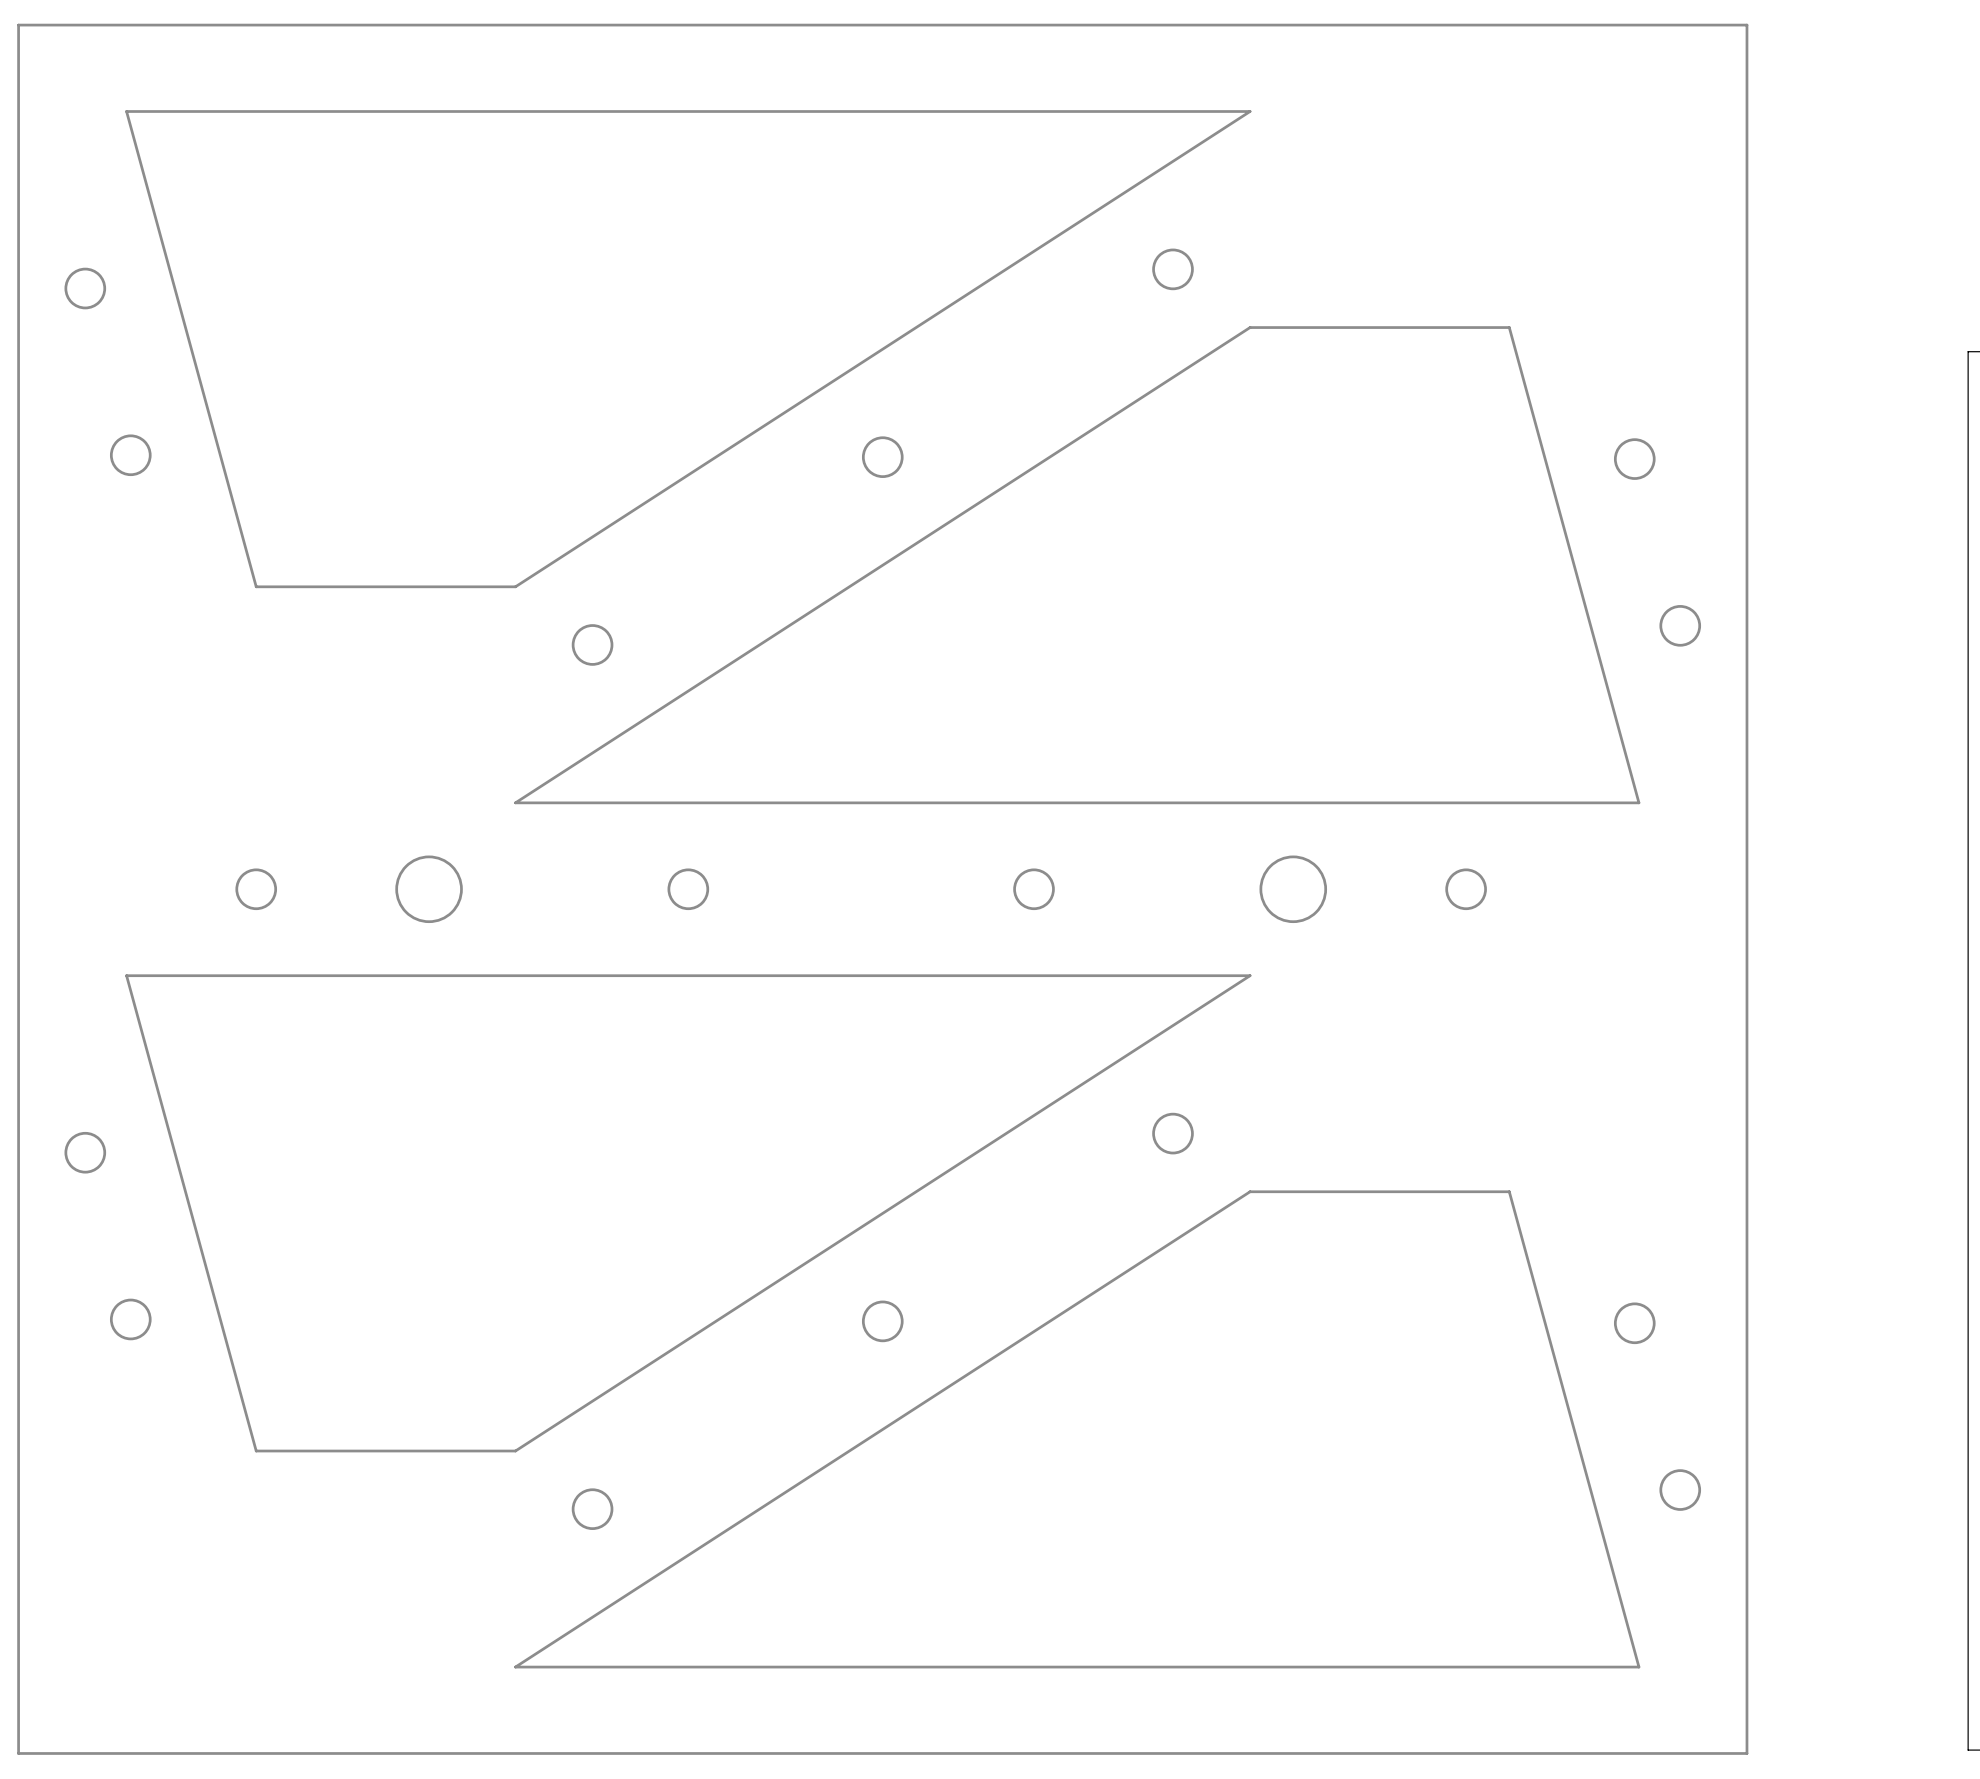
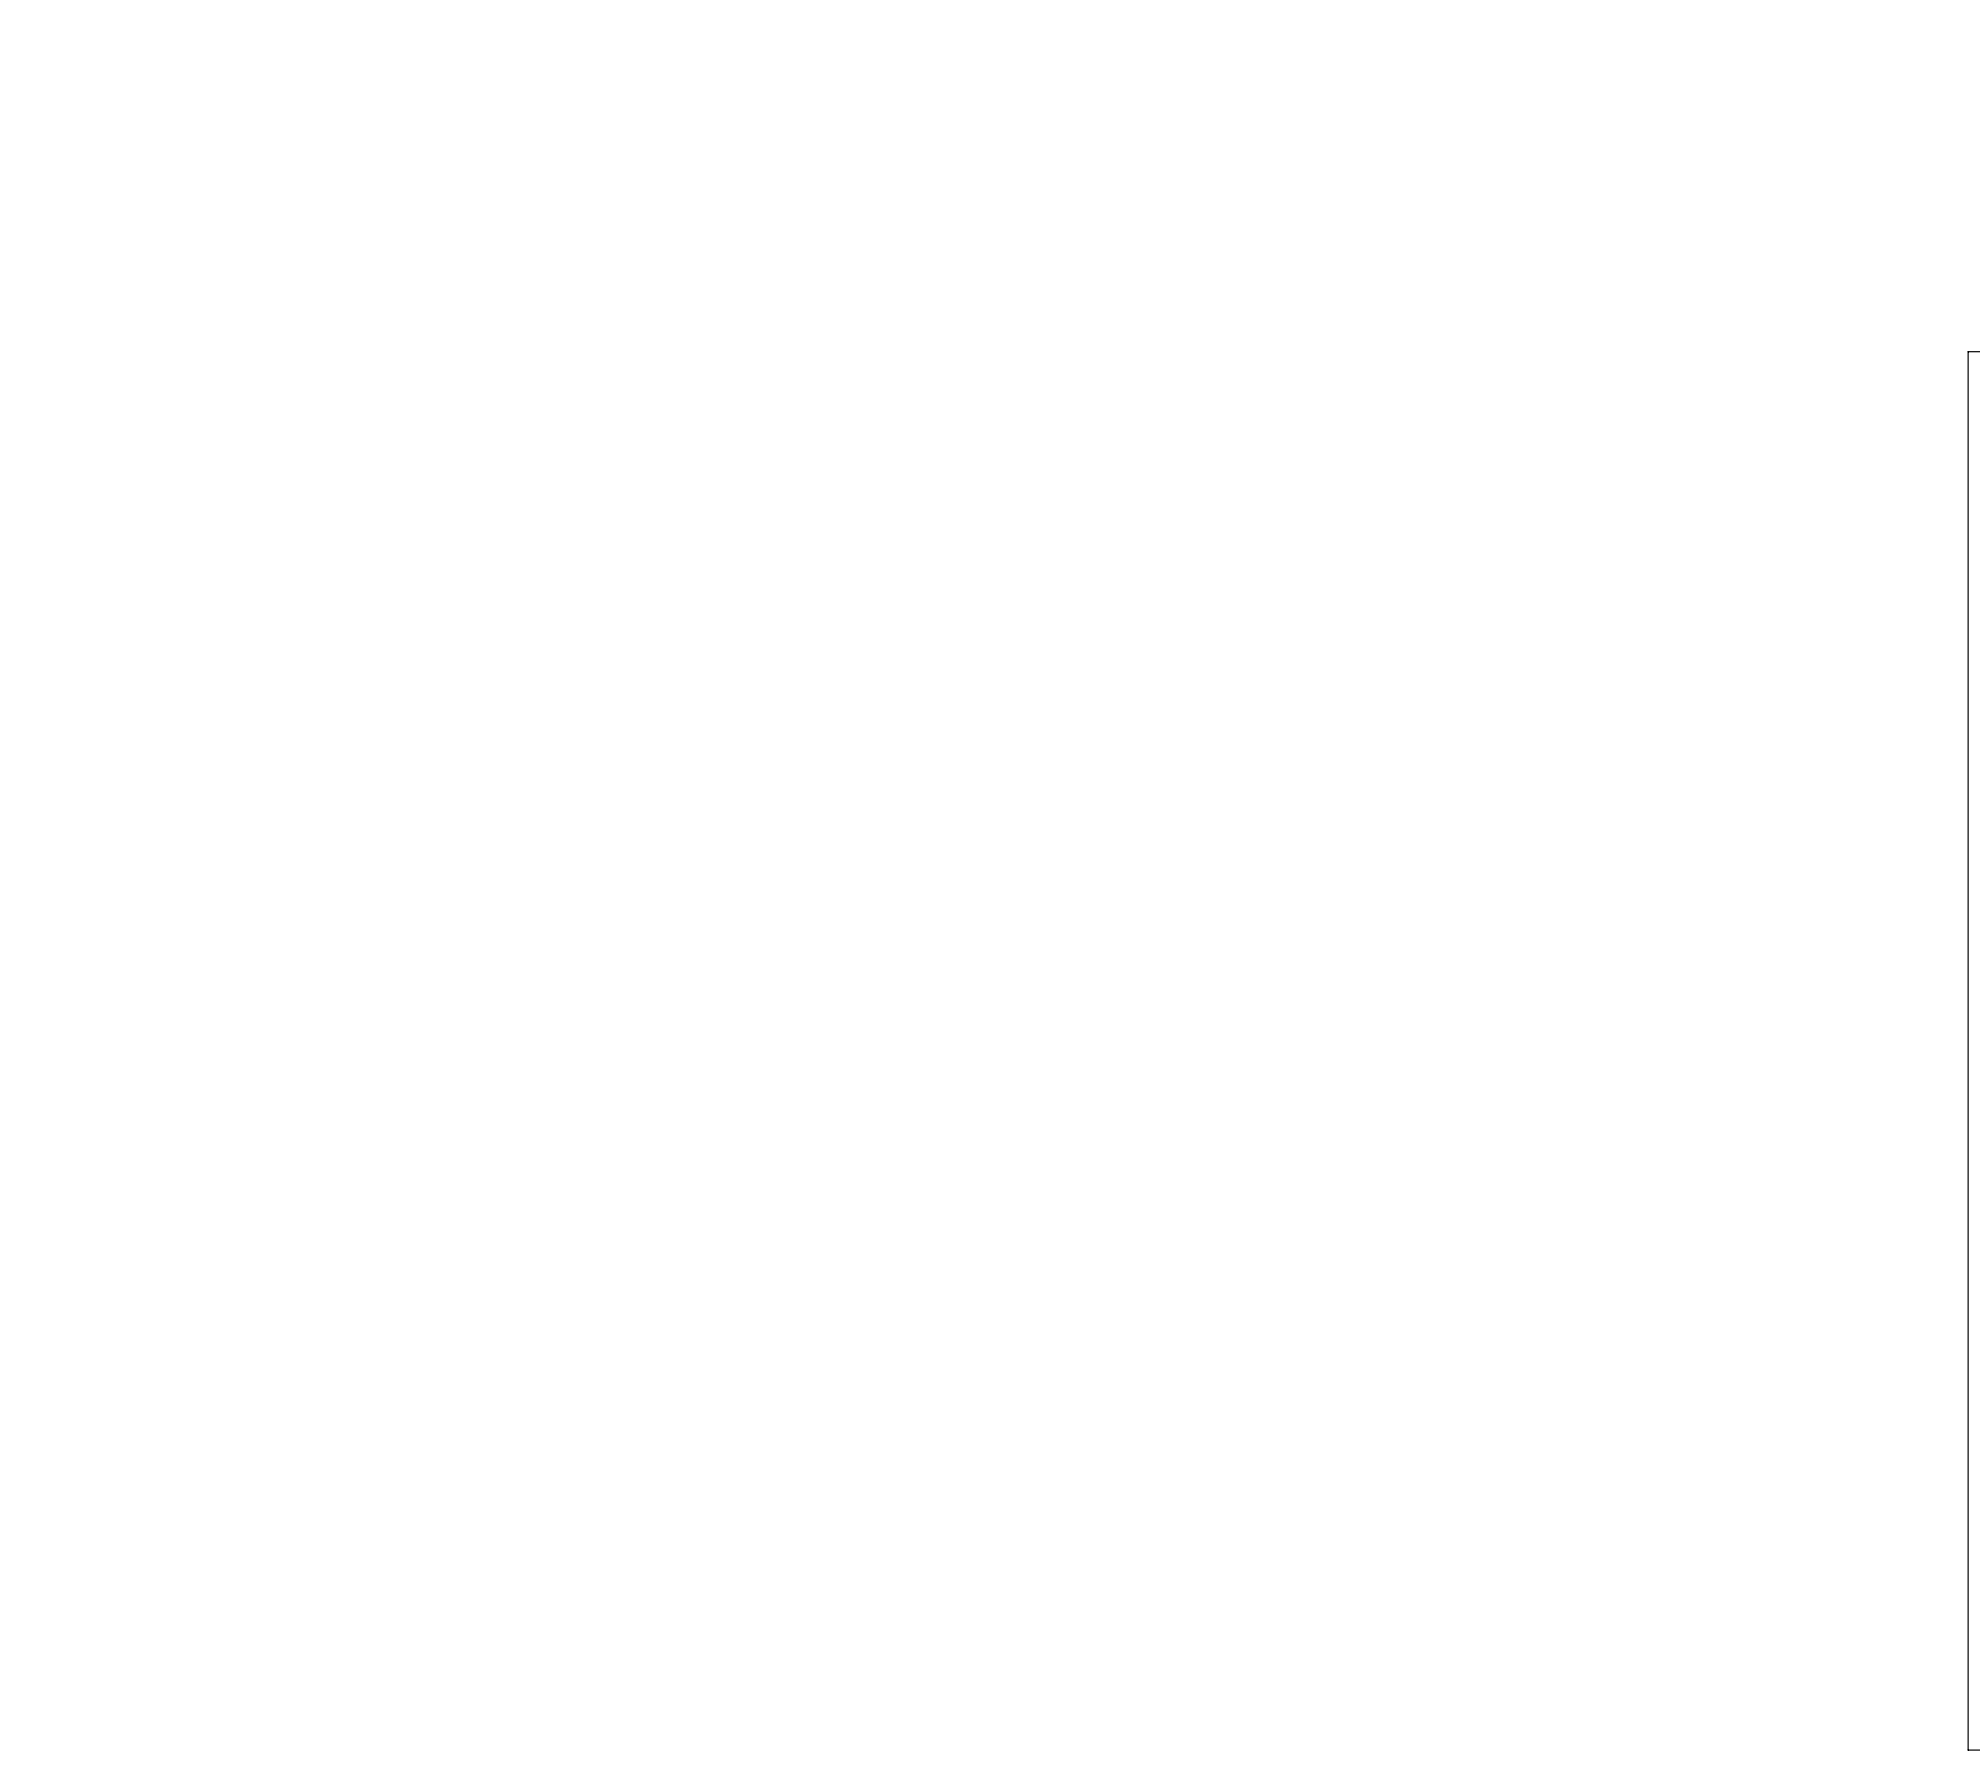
line: (18, 25) (18, 1753) (1746, 1753) (1746, 25) (18, 25) -> none
line: (126, 111) (256, 586) (515, 586) (1250, 111) (126, 111) -> none
drawing: [1152, 248, 1194, 291] -> none
drawing: [64, 267, 107, 310] -> none
line: (1250, 327) (515, 802) (1638, 802) (1509, 327) (1250, 327) -> none
drawing: [109, 434, 152, 477] -> none
drawing: [861, 436, 904, 478] -> none
drawing: [1613, 438, 1656, 480] -> none
drawing: [1659, 605, 1702, 647] -> none
drawing: [571, 624, 614, 666] -> none
drawing: [395, 855, 463, 924] -> none
drawing: [1259, 855, 1328, 924] -> none
drawing: [235, 868, 278, 911] -> none
drawing: [667, 868, 710, 911] -> none
drawing: [1013, 868, 1055, 911] -> none
drawing: [1445, 868, 1487, 911] -> none
line: (126, 975) (256, 1451) (515, 1451) (1250, 975) (126, 975) -> none
drawing: [1152, 1112, 1194, 1155] -> none
drawing: [64, 1131, 107, 1174] -> none
line: (1250, 1191) (515, 1667) (1638, 1667) (1509, 1191) (1250, 1191) -> none
drawing: [109, 1298, 152, 1341] -> none
drawing: [861, 1300, 904, 1343] -> none
drawing: [1613, 1302, 1656, 1345] -> none
drawing: [1659, 1469, 1702, 1511] -> none
drawing: [571, 1488, 614, 1530] -> none

